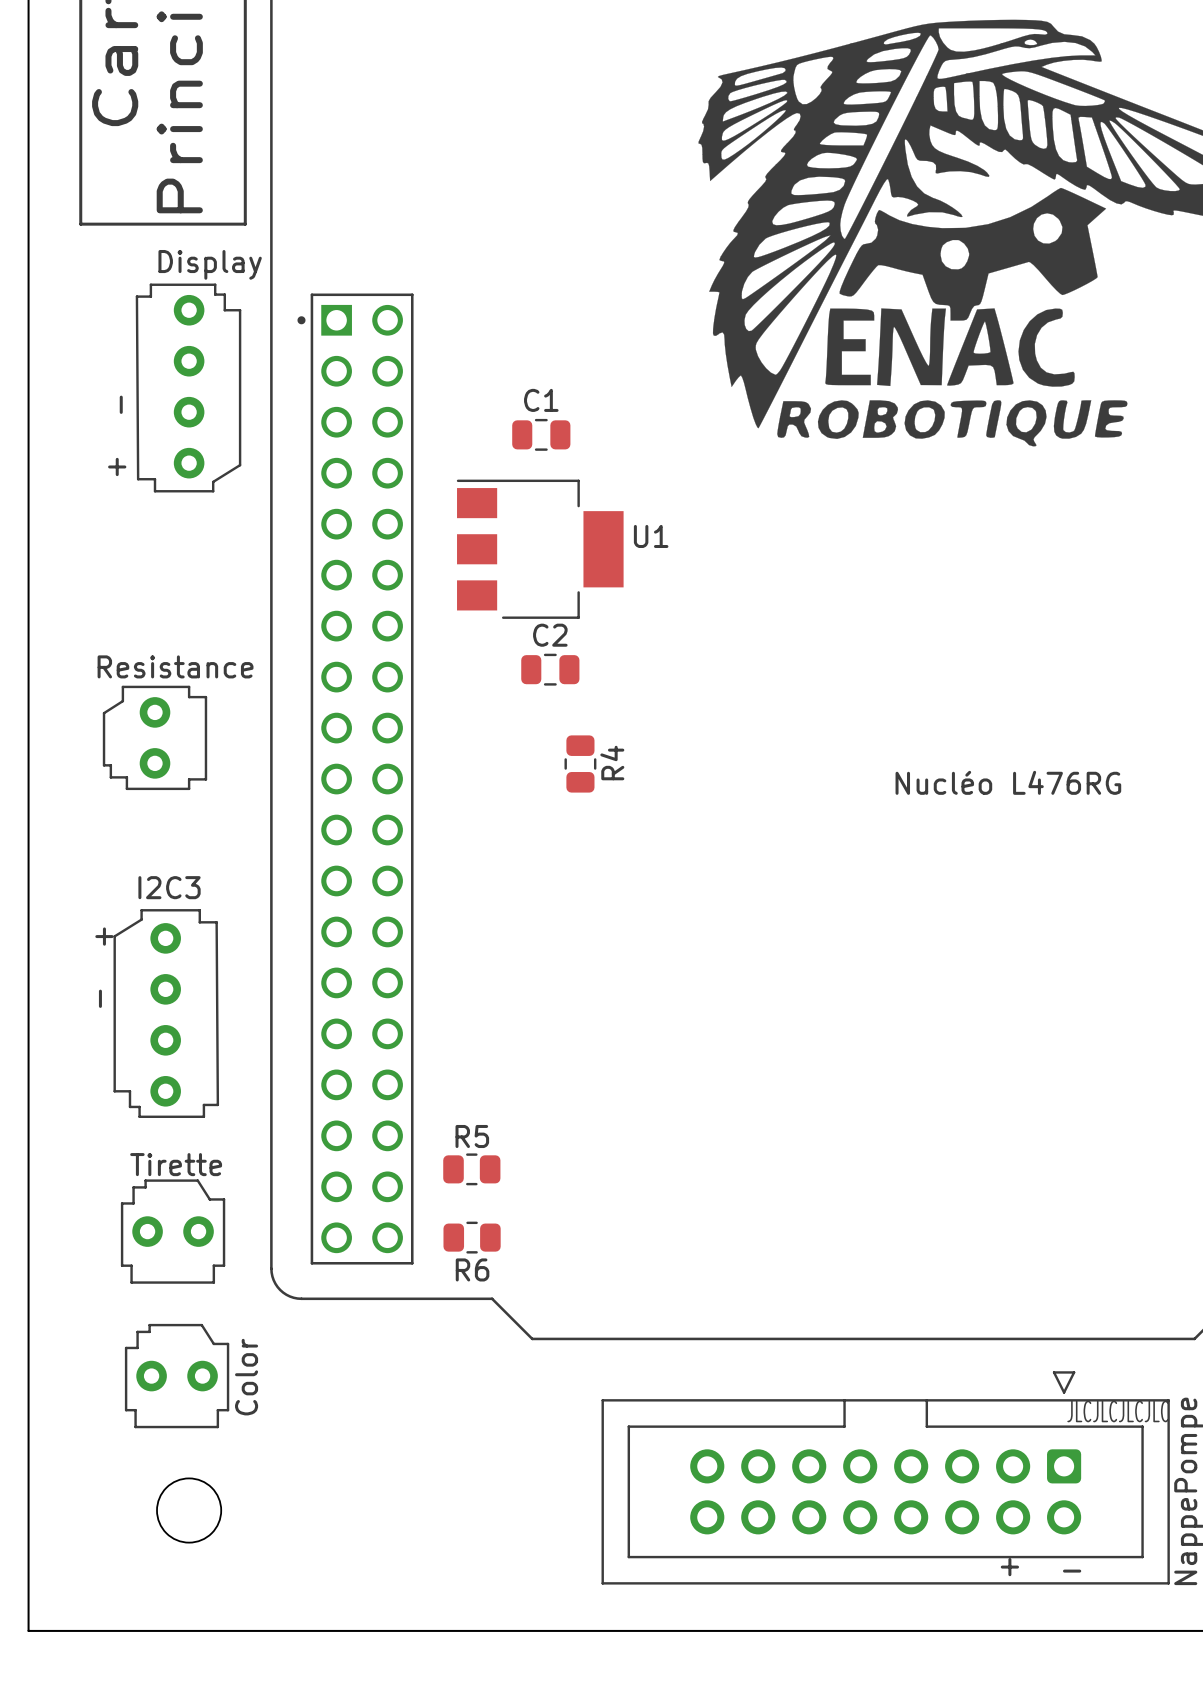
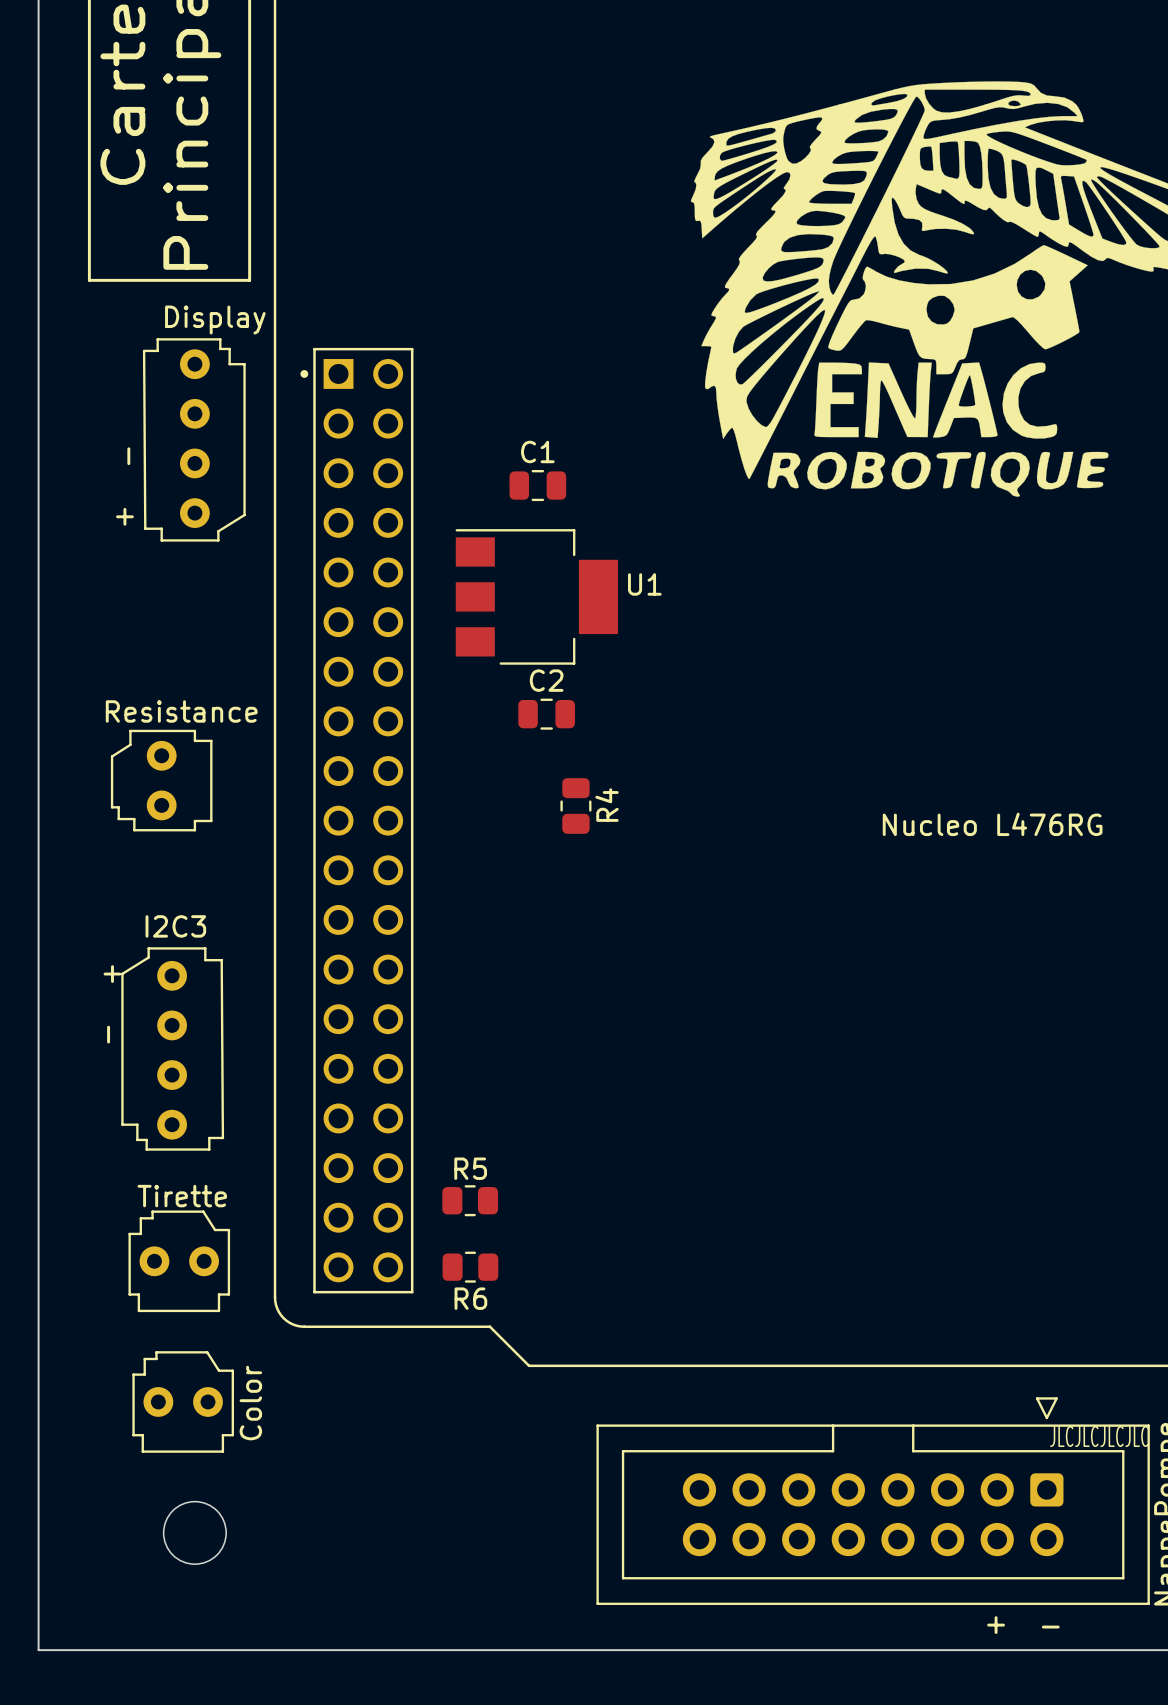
Nucléo L476RG name: Nucléo L476RG (1008, 782) -> Nucleo L476RG (992, 824)
text position: + (1009, 1567) -> + (996, 1625)
text position: - (1072, 1571) -> - (1050, 1627)

